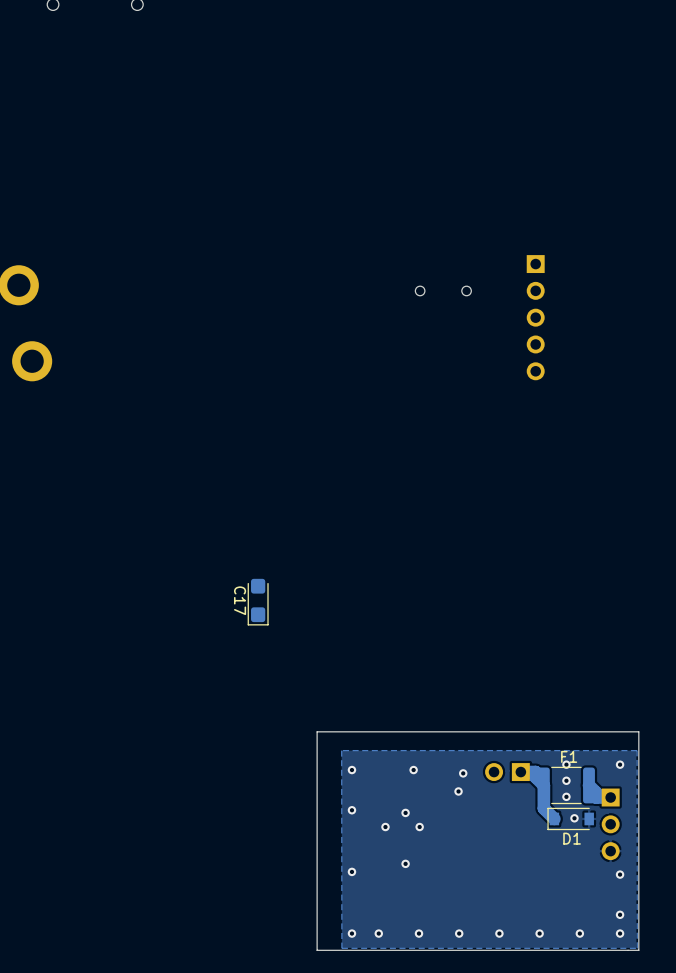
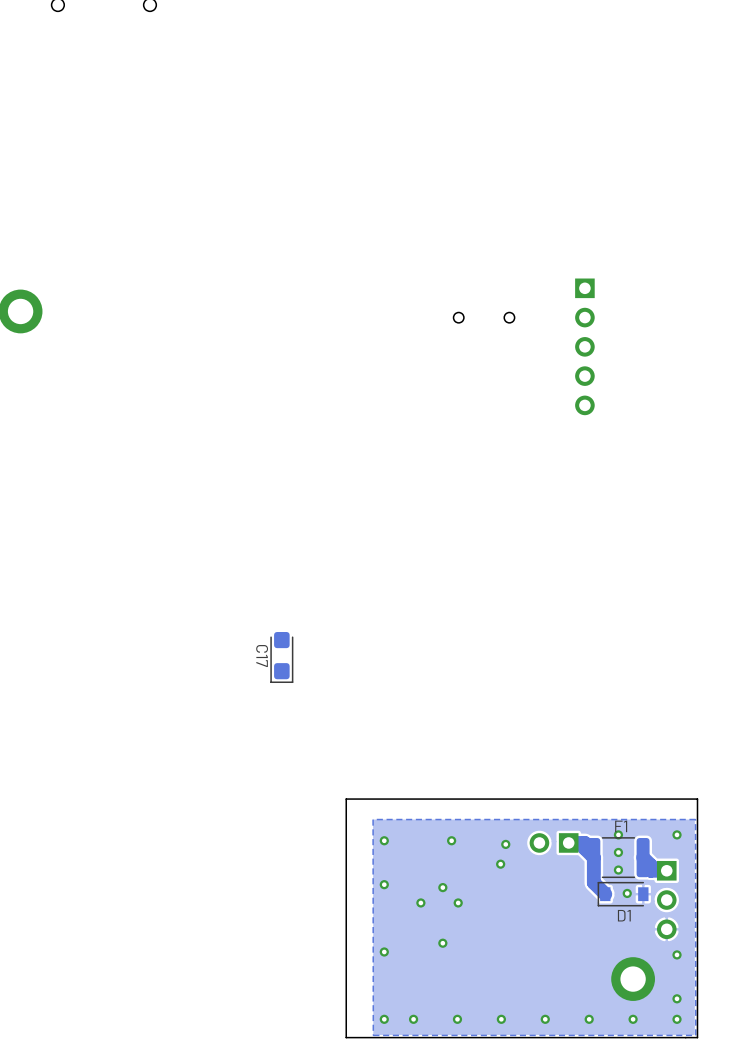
part: (32, 361) -> none
part: none -> (633, 979)

